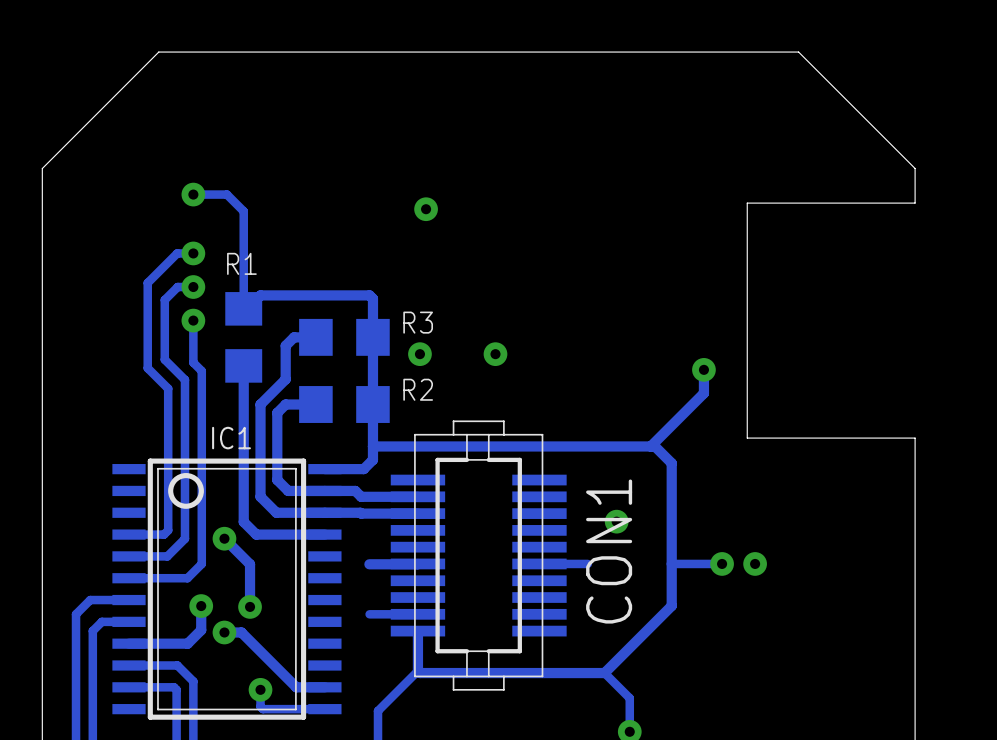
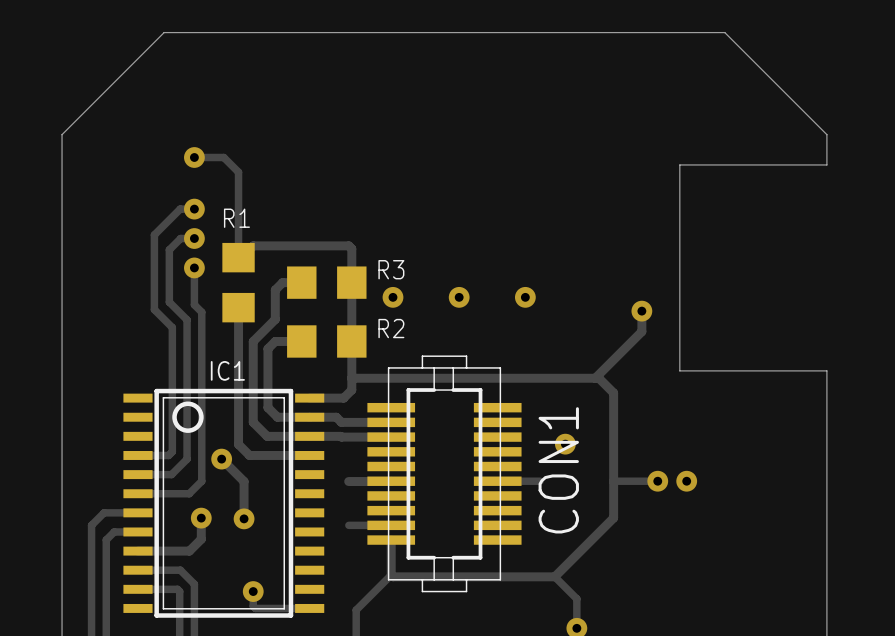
via: (426, 209) -> none
via: none -> (525, 297)
track: (224, 632) (241, 632) (296, 687) (324, 687) -> none
via: (224, 632) -> none

